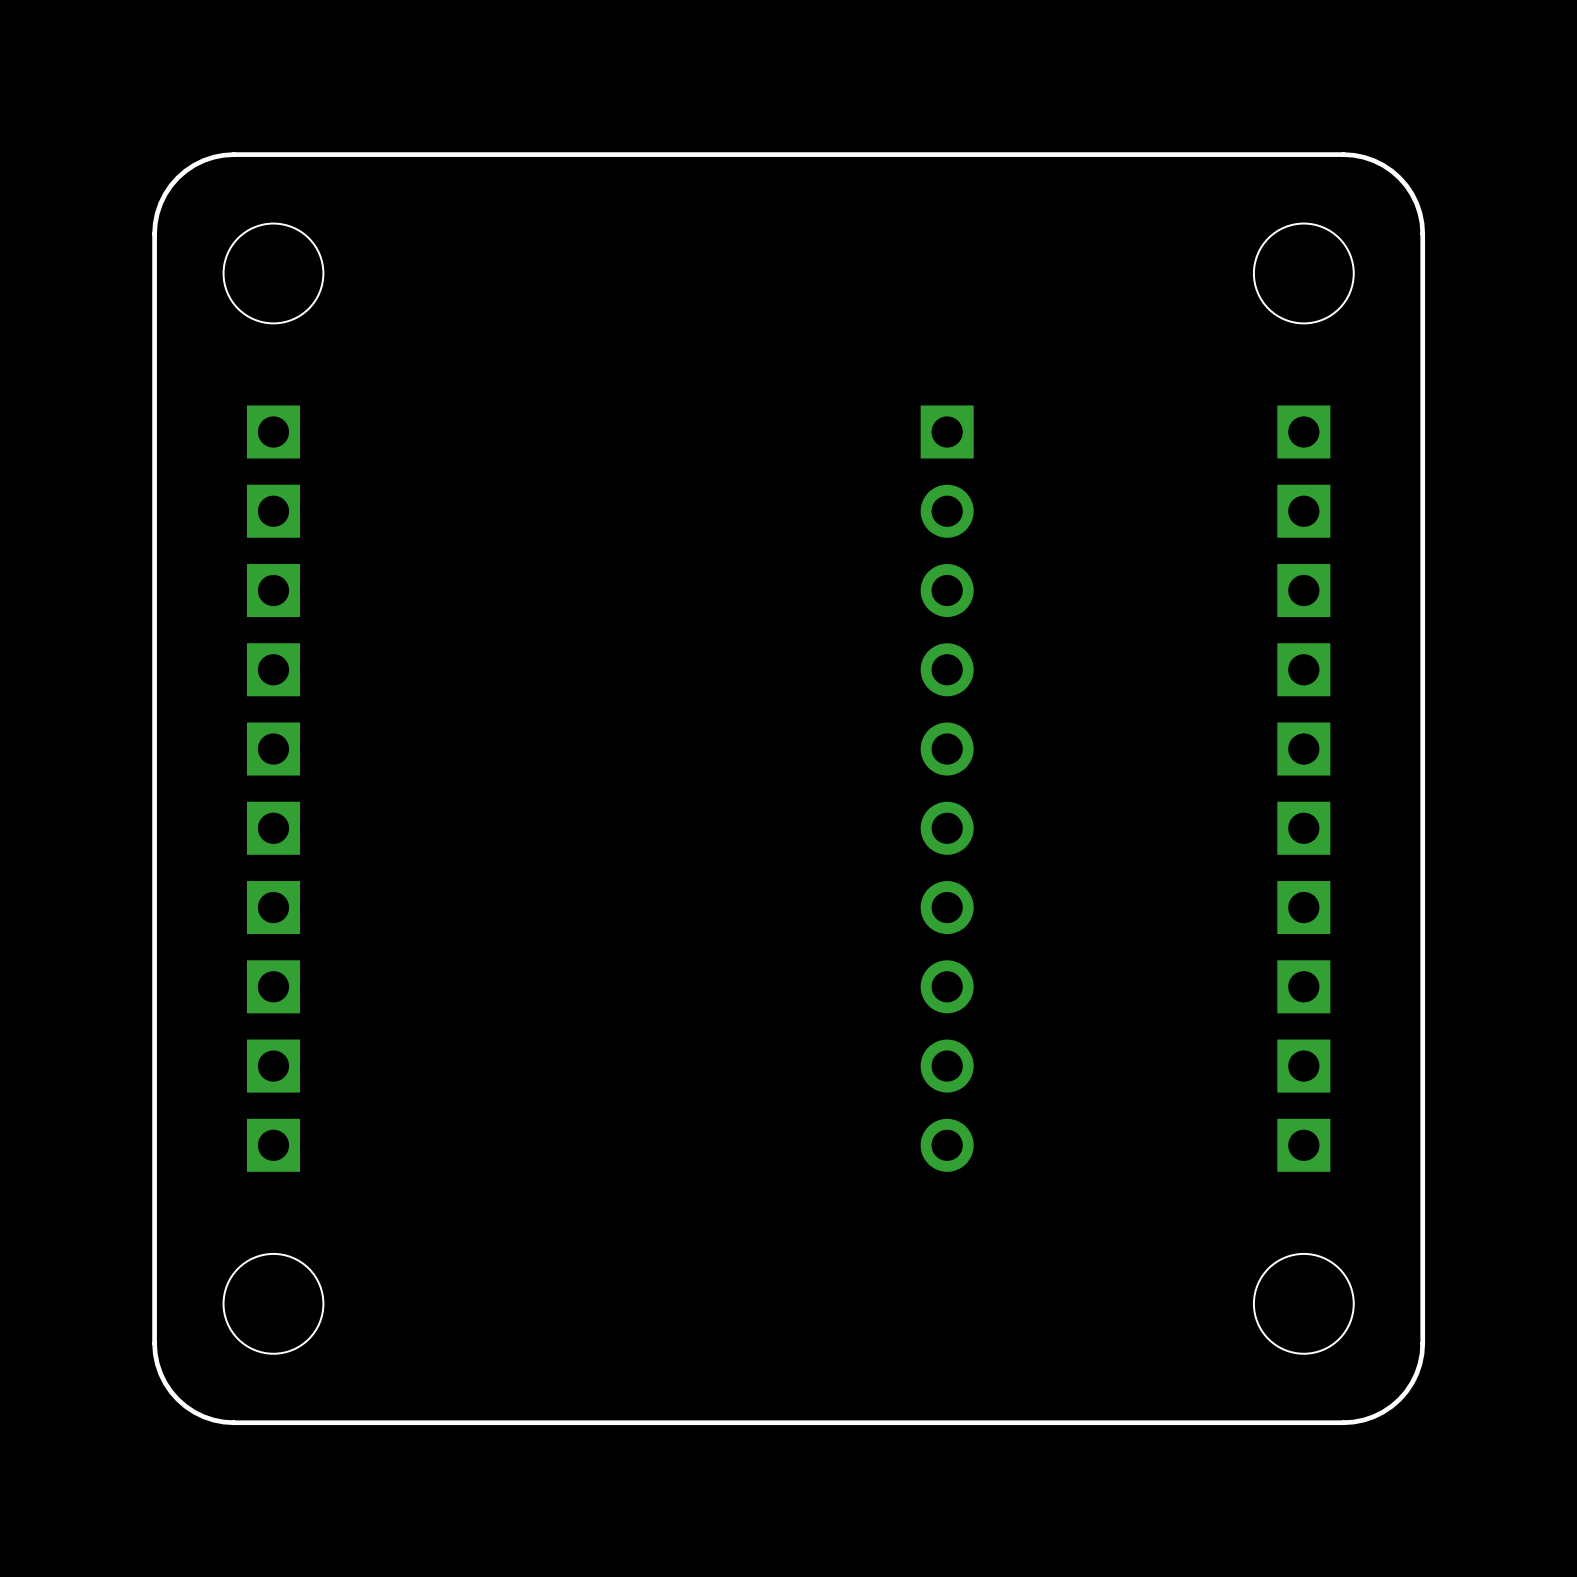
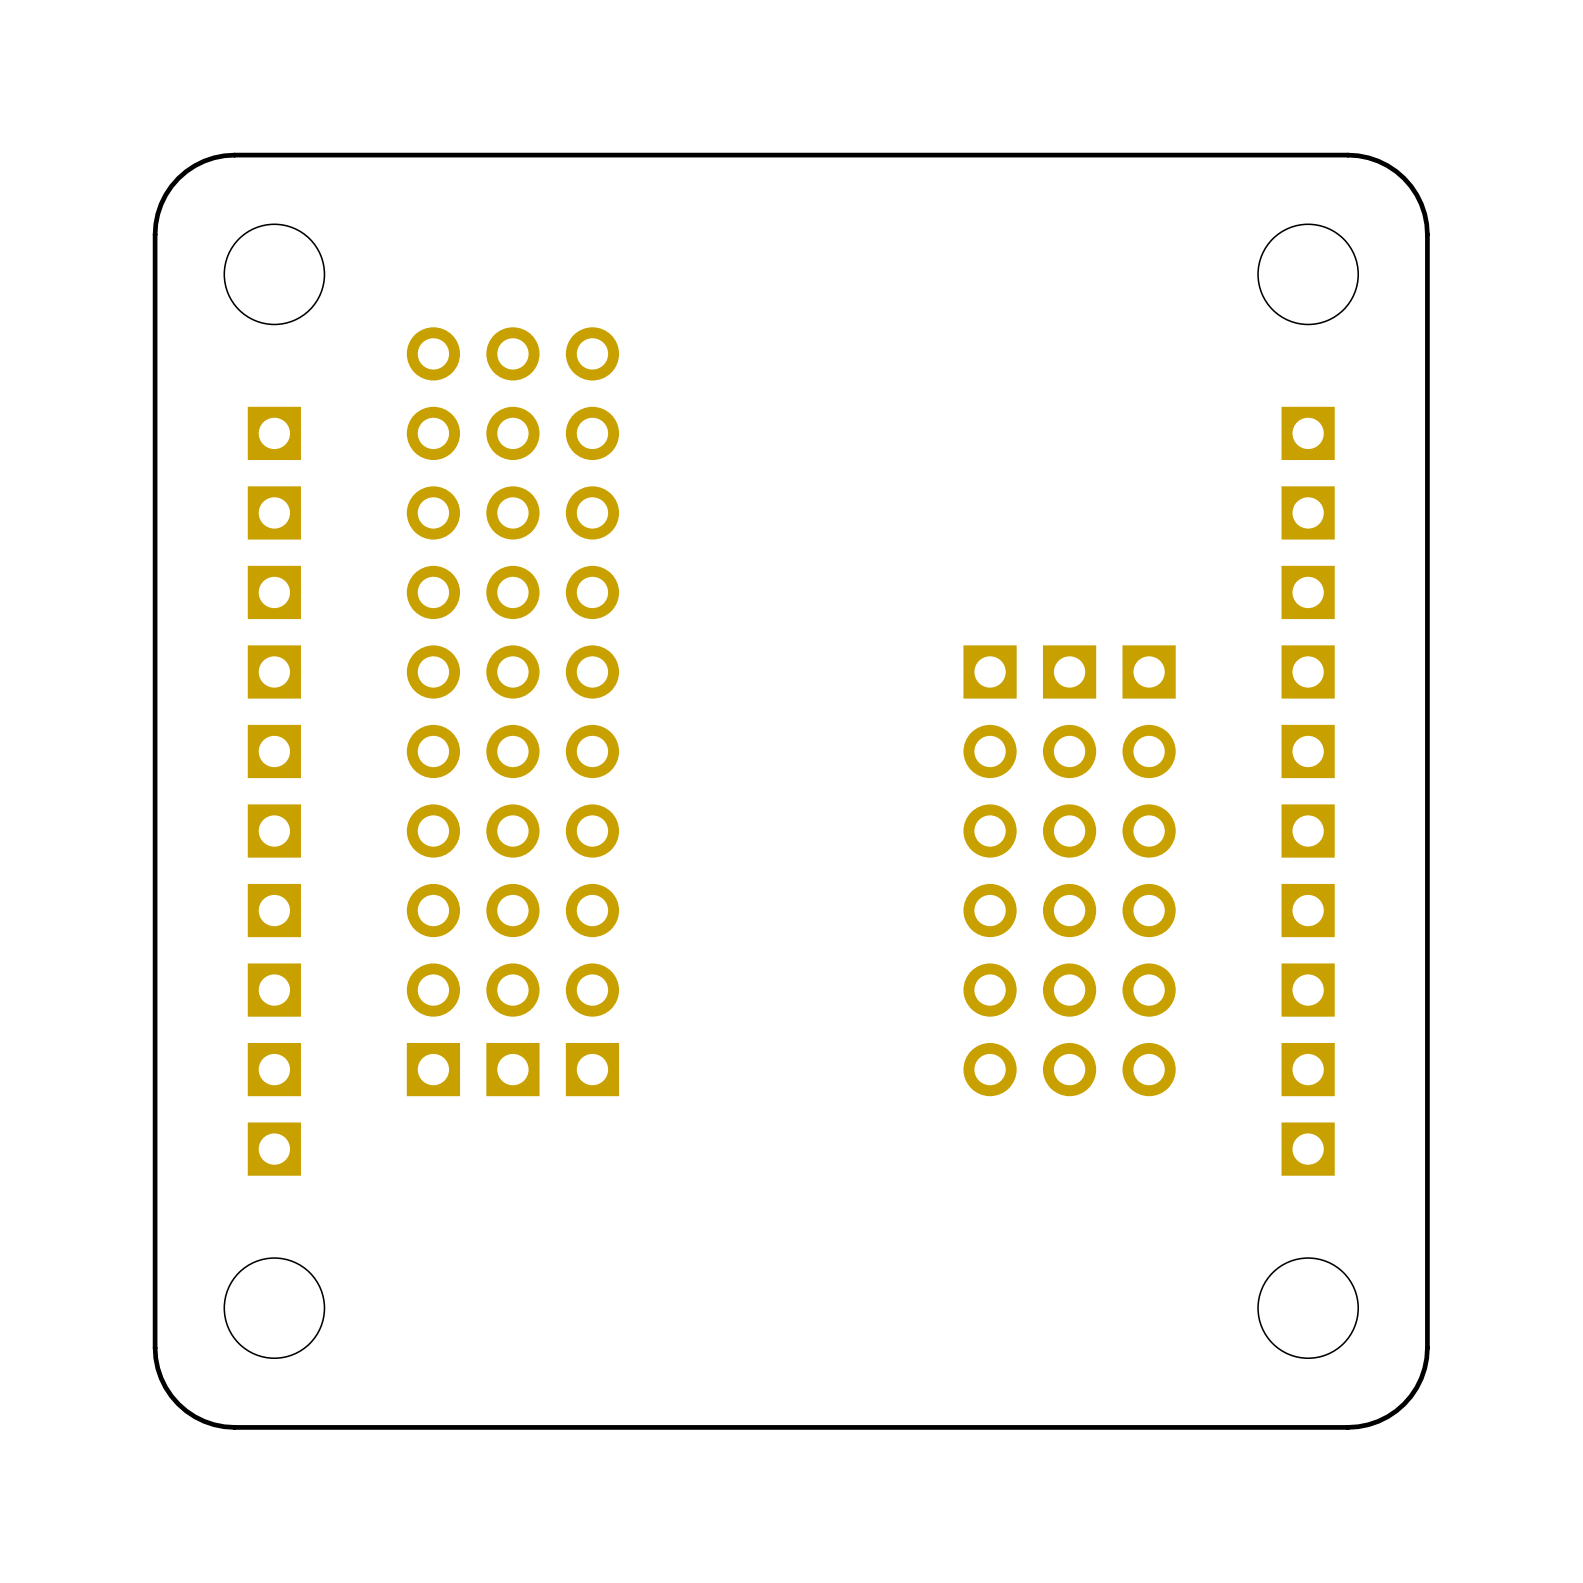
part: none -> (433, 711)
part: none -> (512, 711)
part: none -> (592, 711)
part: (947, 788) -> none
part: none -> (990, 870)
part: none -> (1069, 870)
part: none -> (1149, 870)

